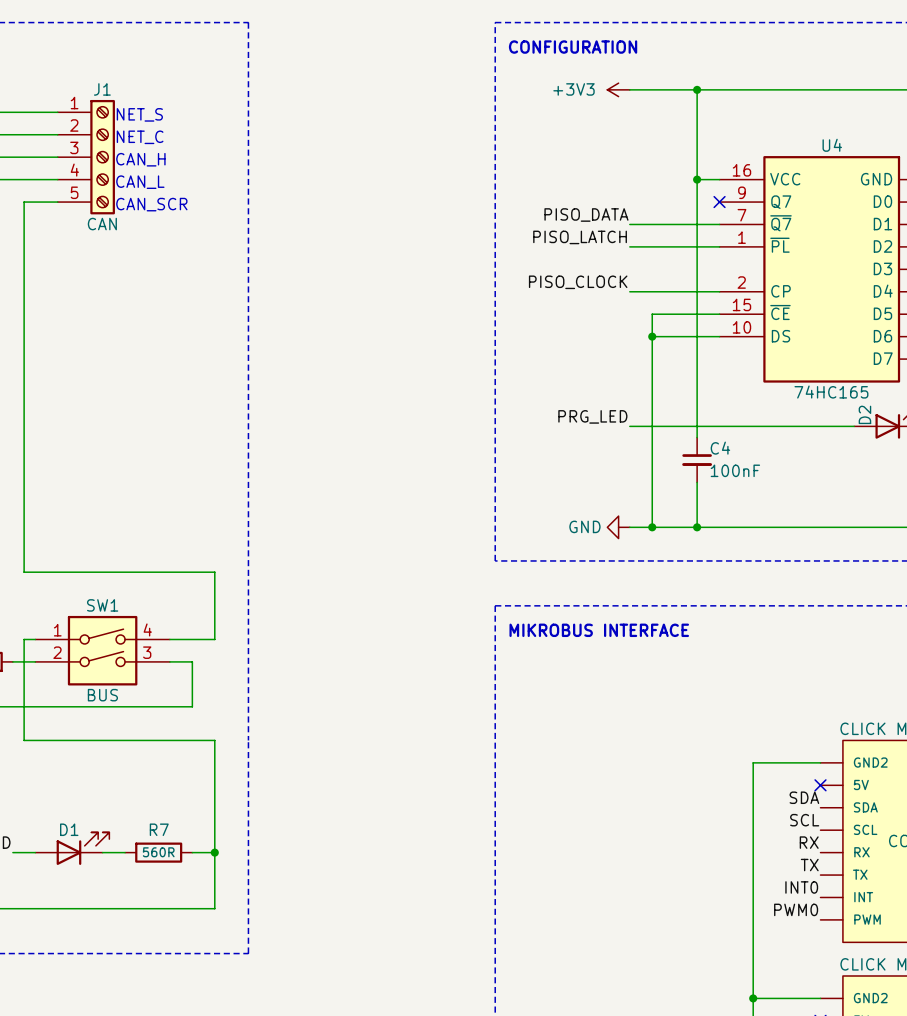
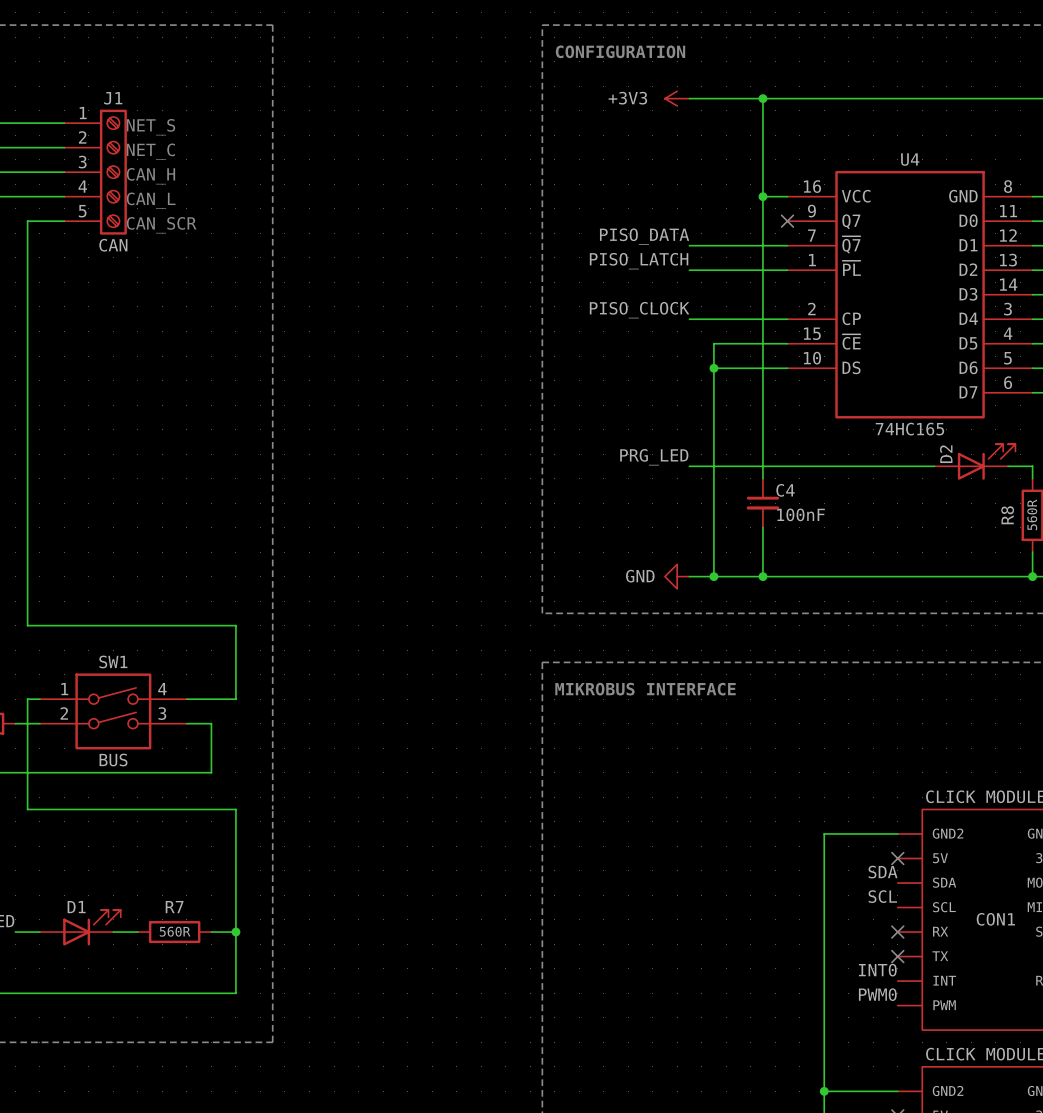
label: RX (809, 842) -> none
no-connect mark: none -> (897, 932)
label: TX (809, 865) -> none
no-connect mark: none -> (897, 956)

